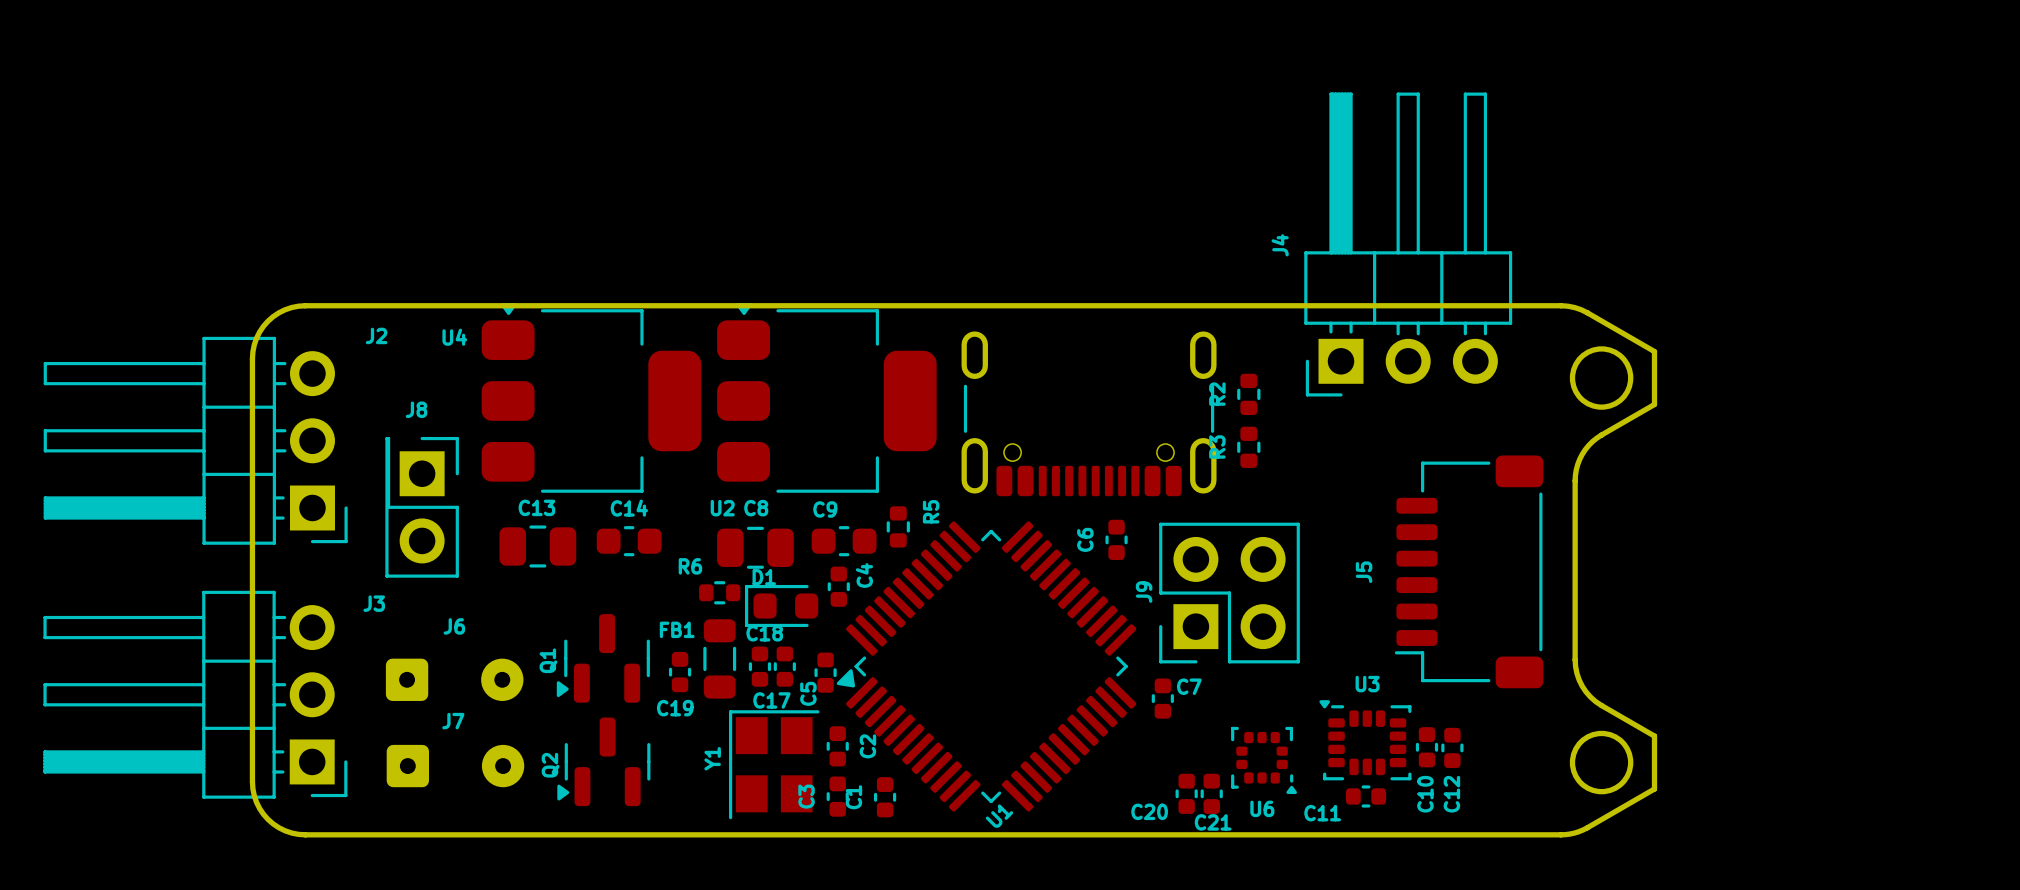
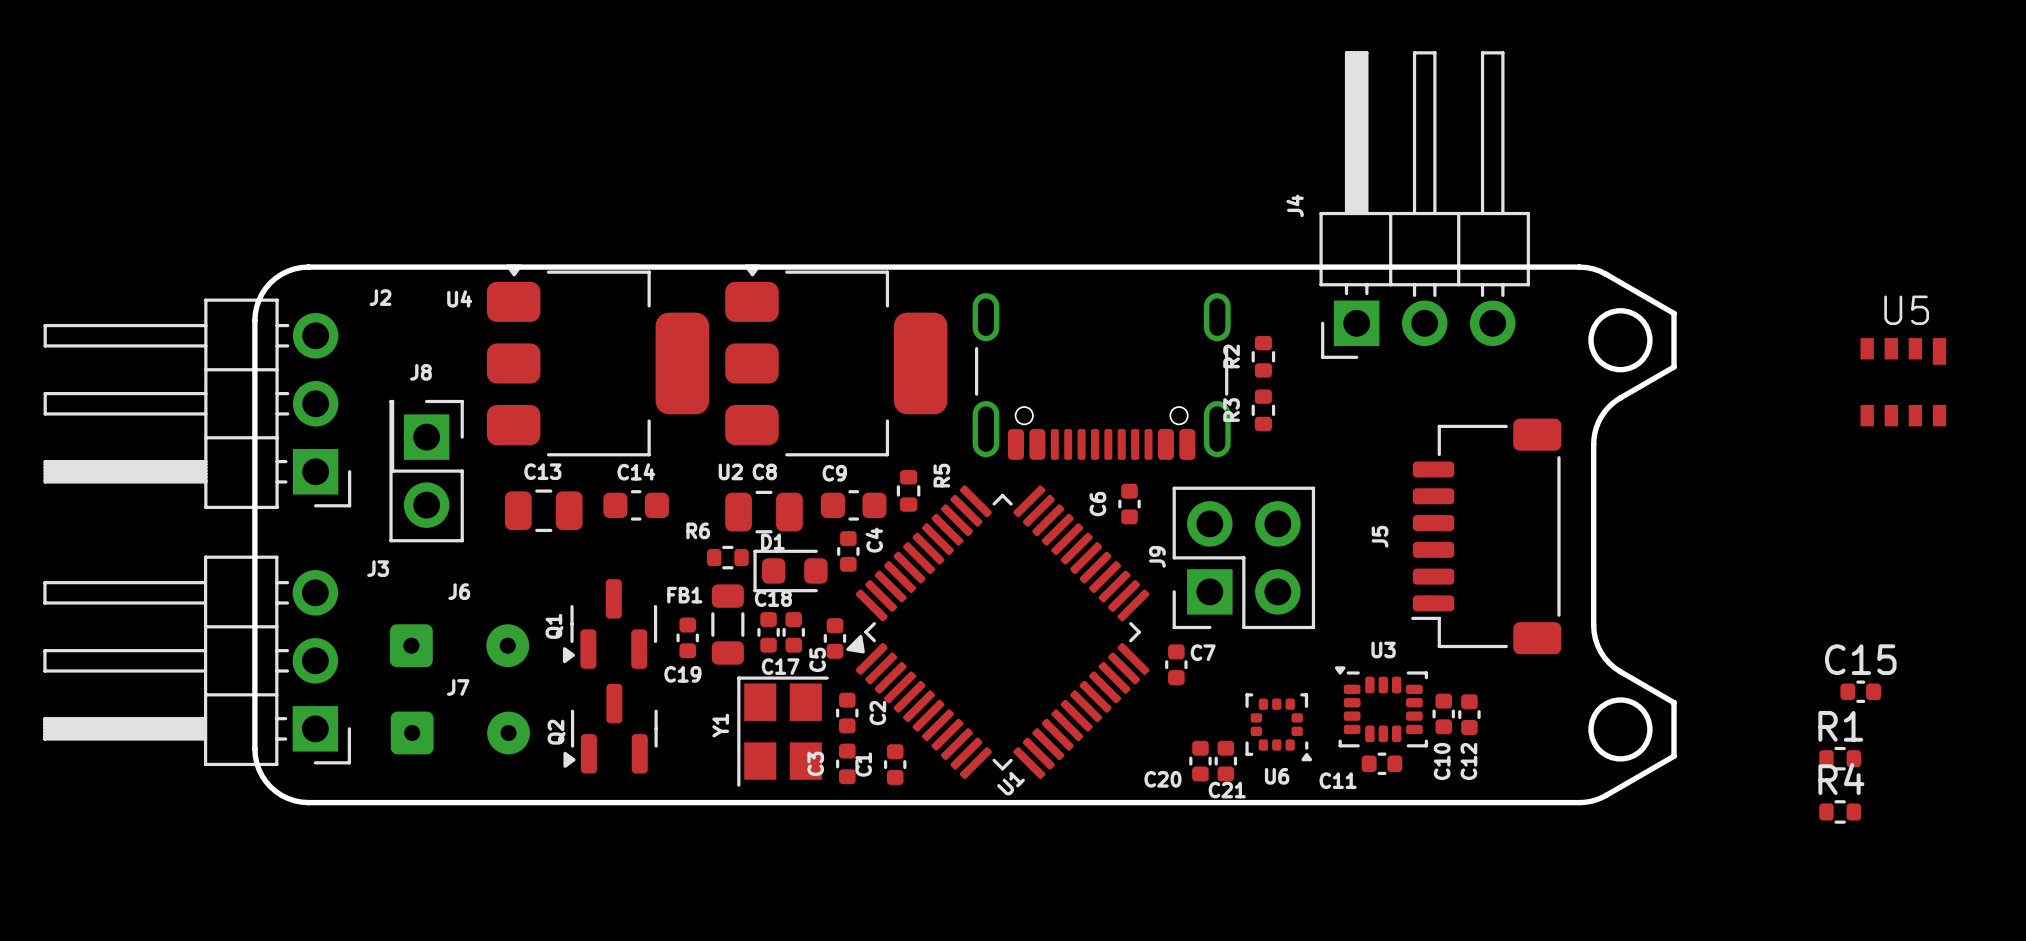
U5: none -> (1903, 382)
C15: none -> (1860, 691)
R1: none -> (1840, 758)
R4: none -> (1840, 811)

